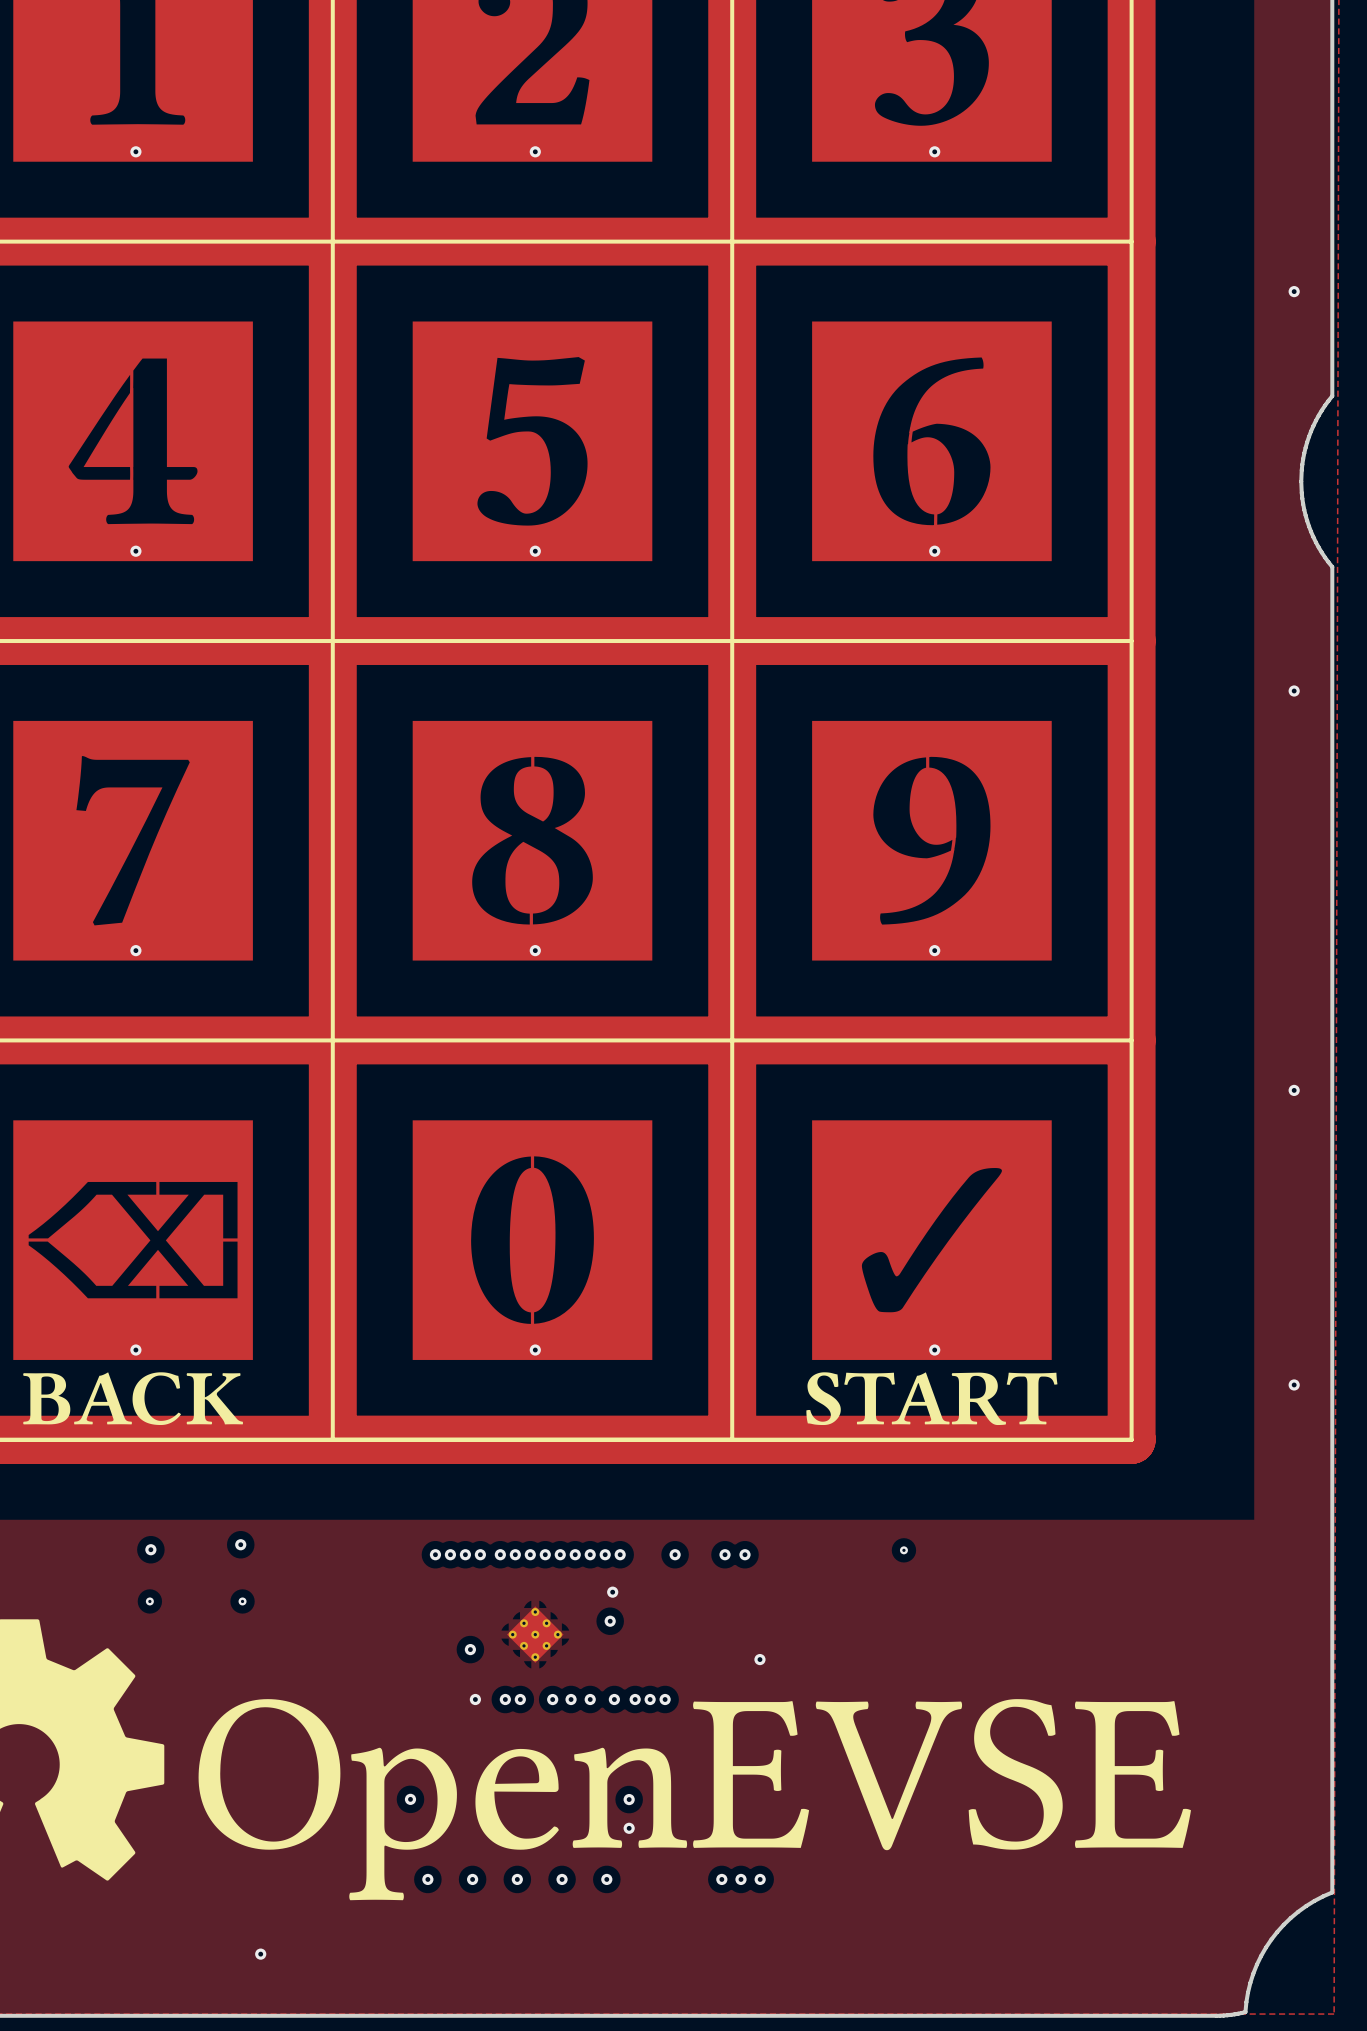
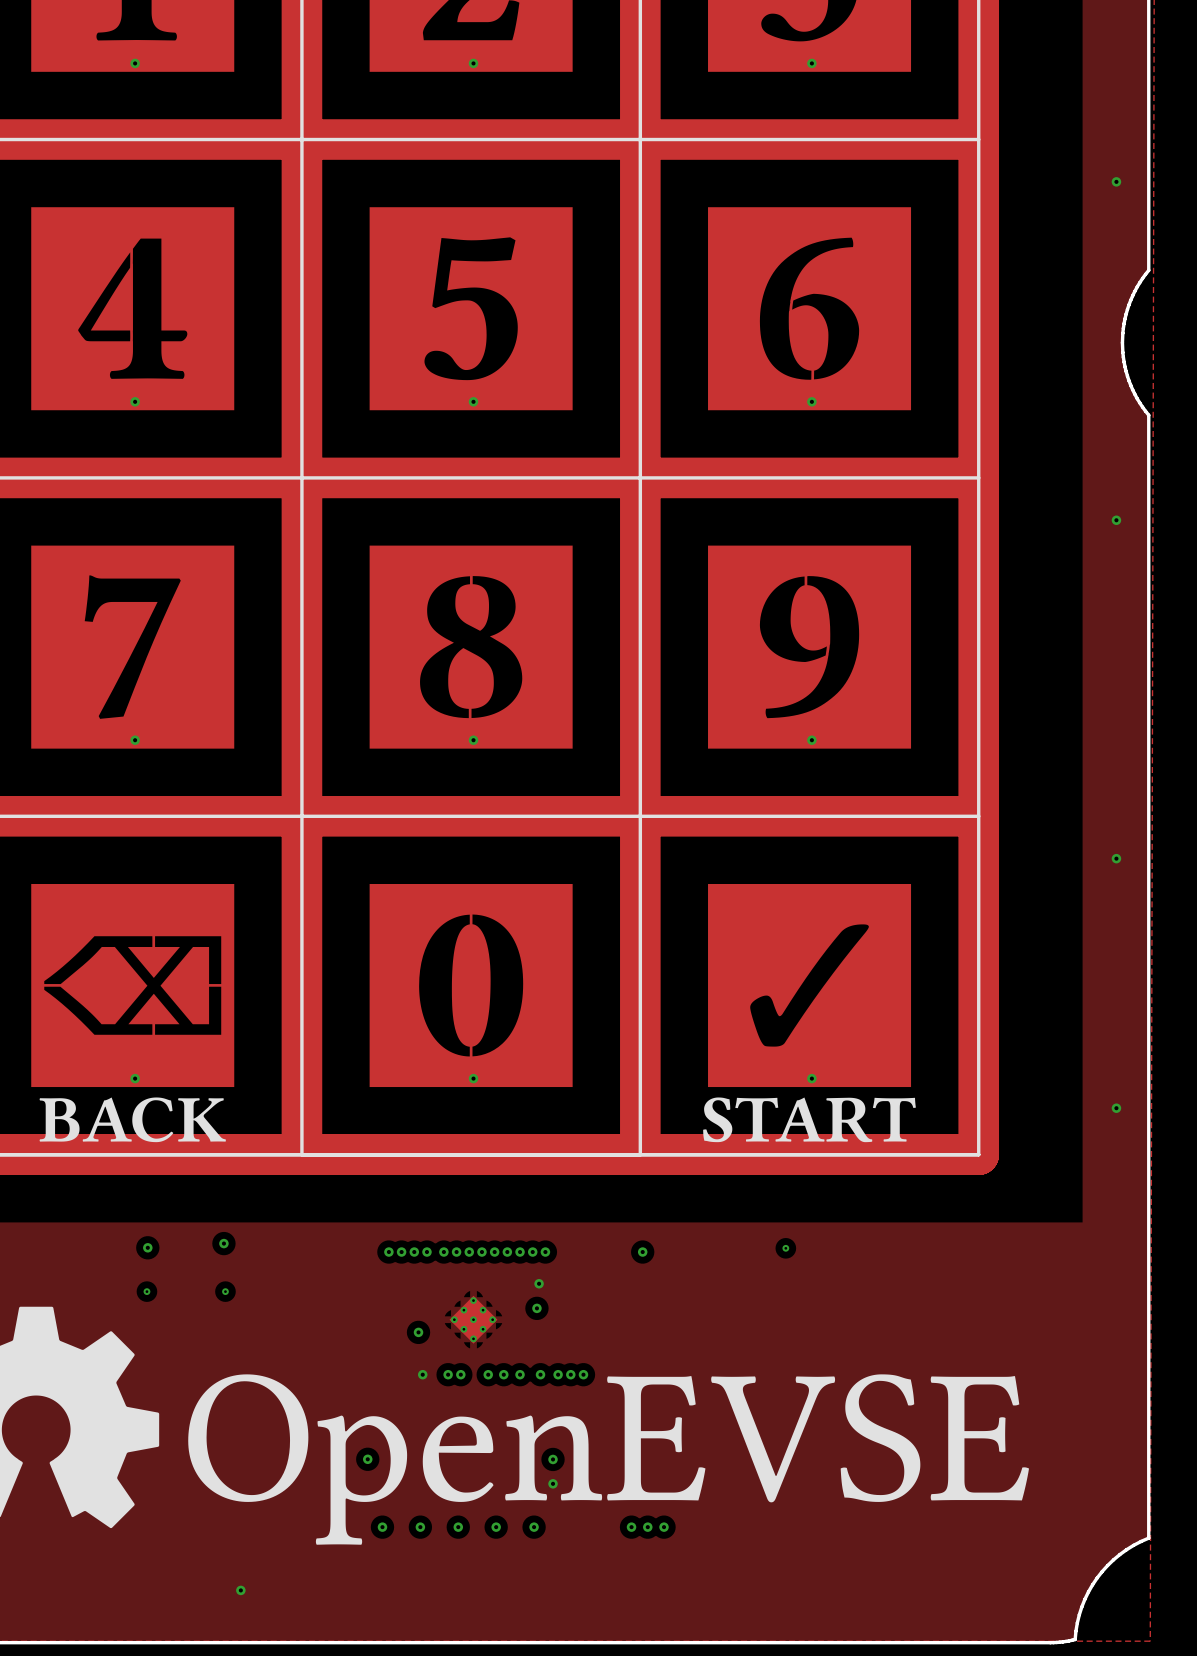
via: (675, 1554) -> none
via: (725, 1554) -> none
via: none -> (642, 1252)
via: (744, 1554) -> none
via: (759, 1659) -> none

